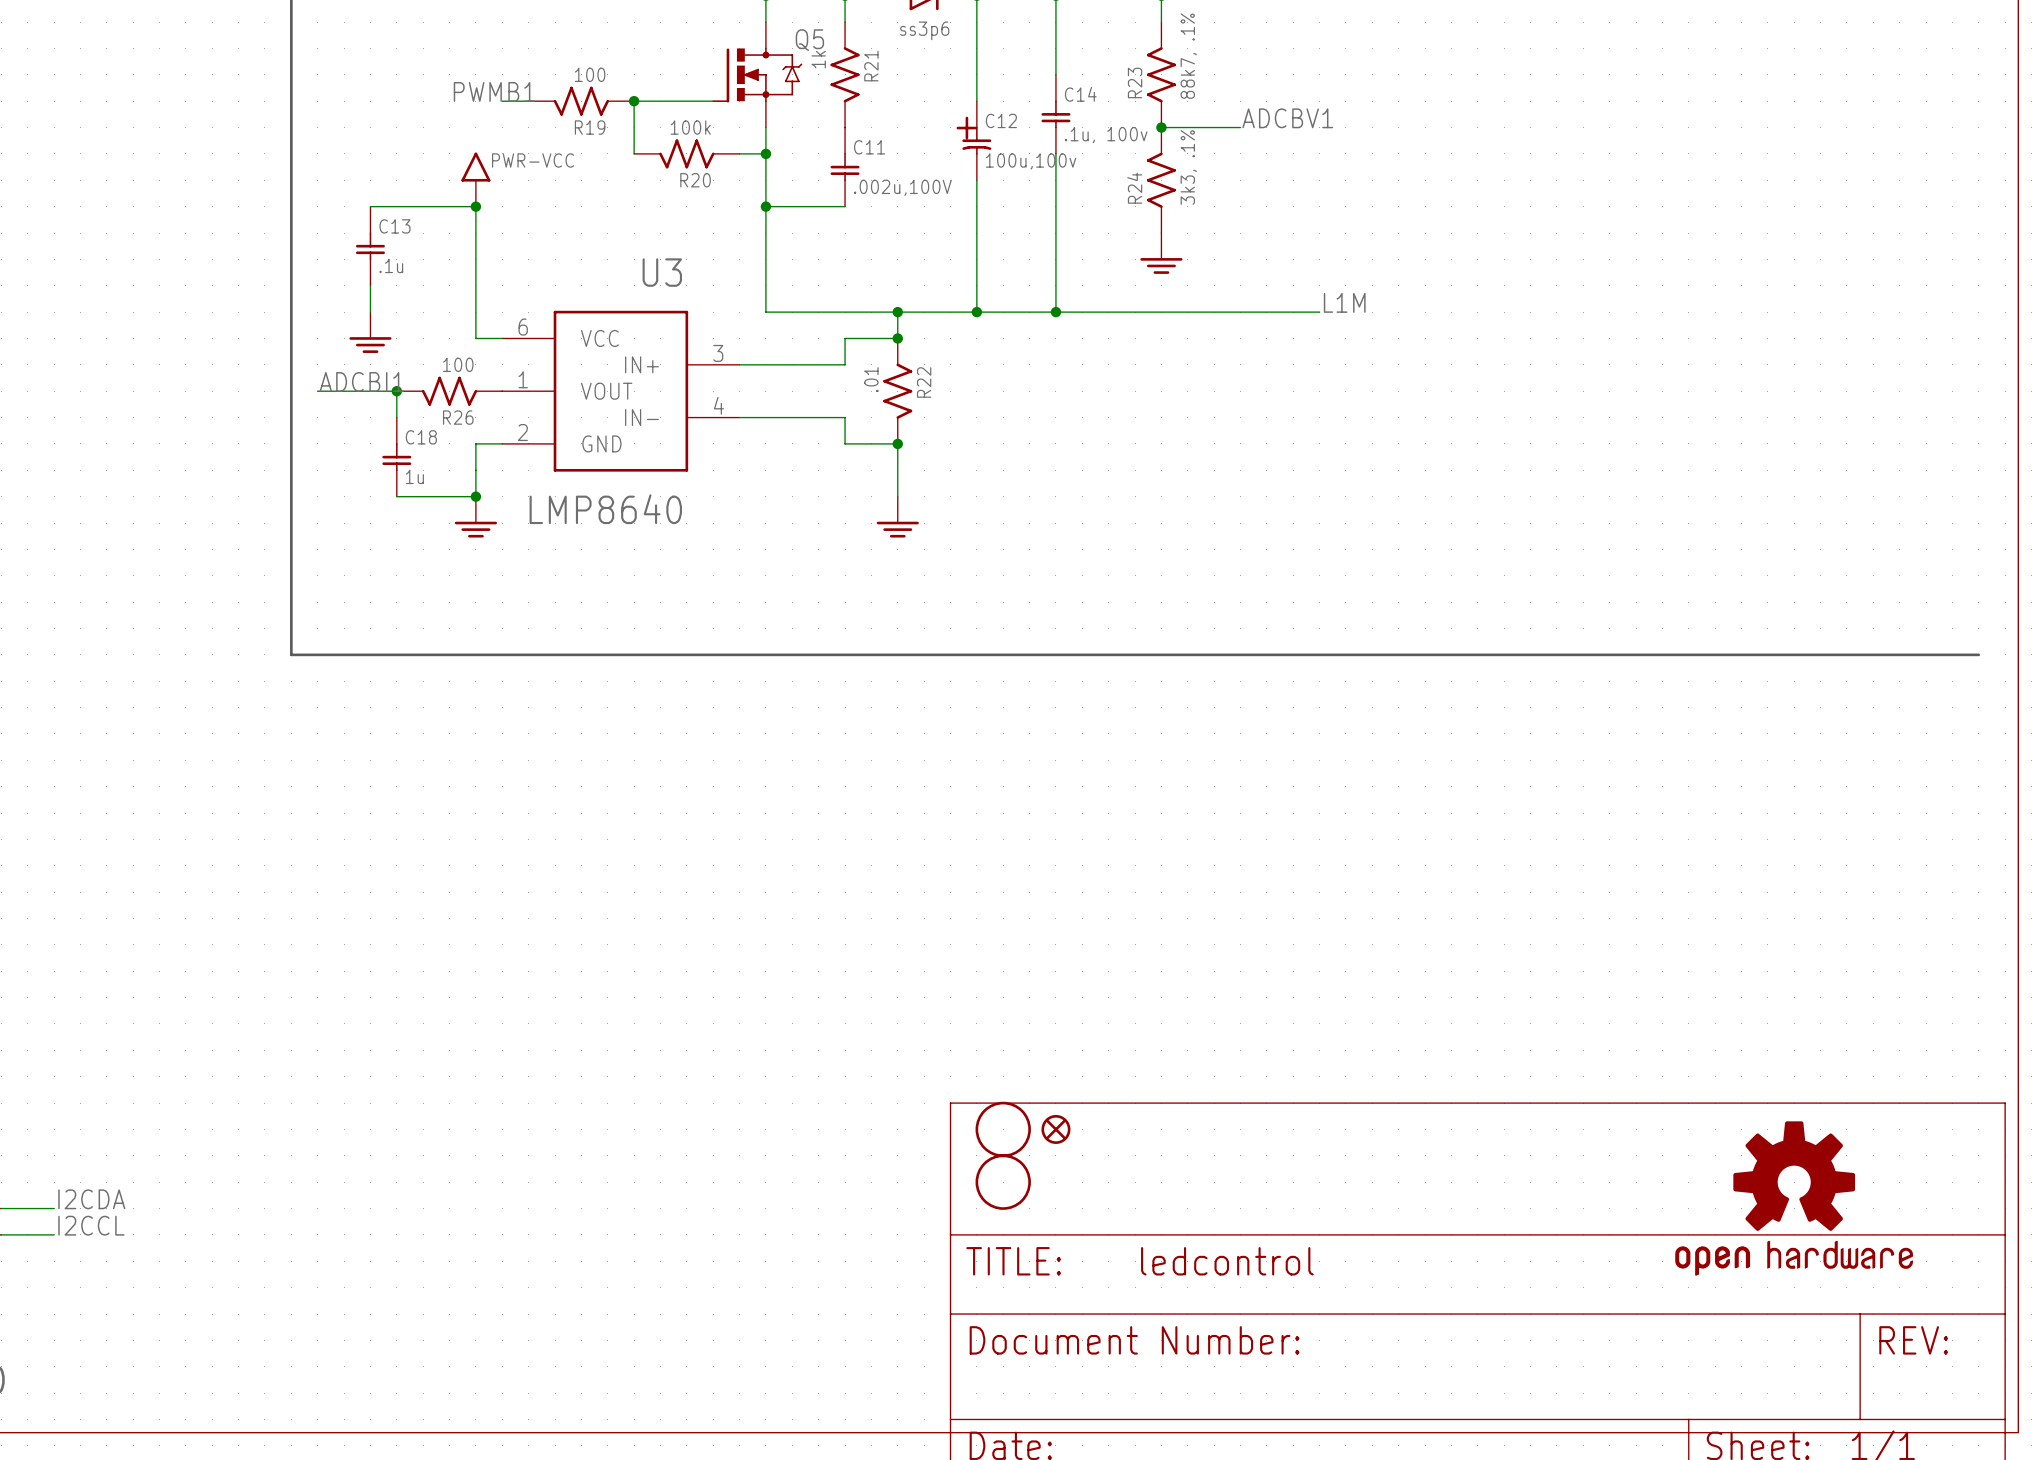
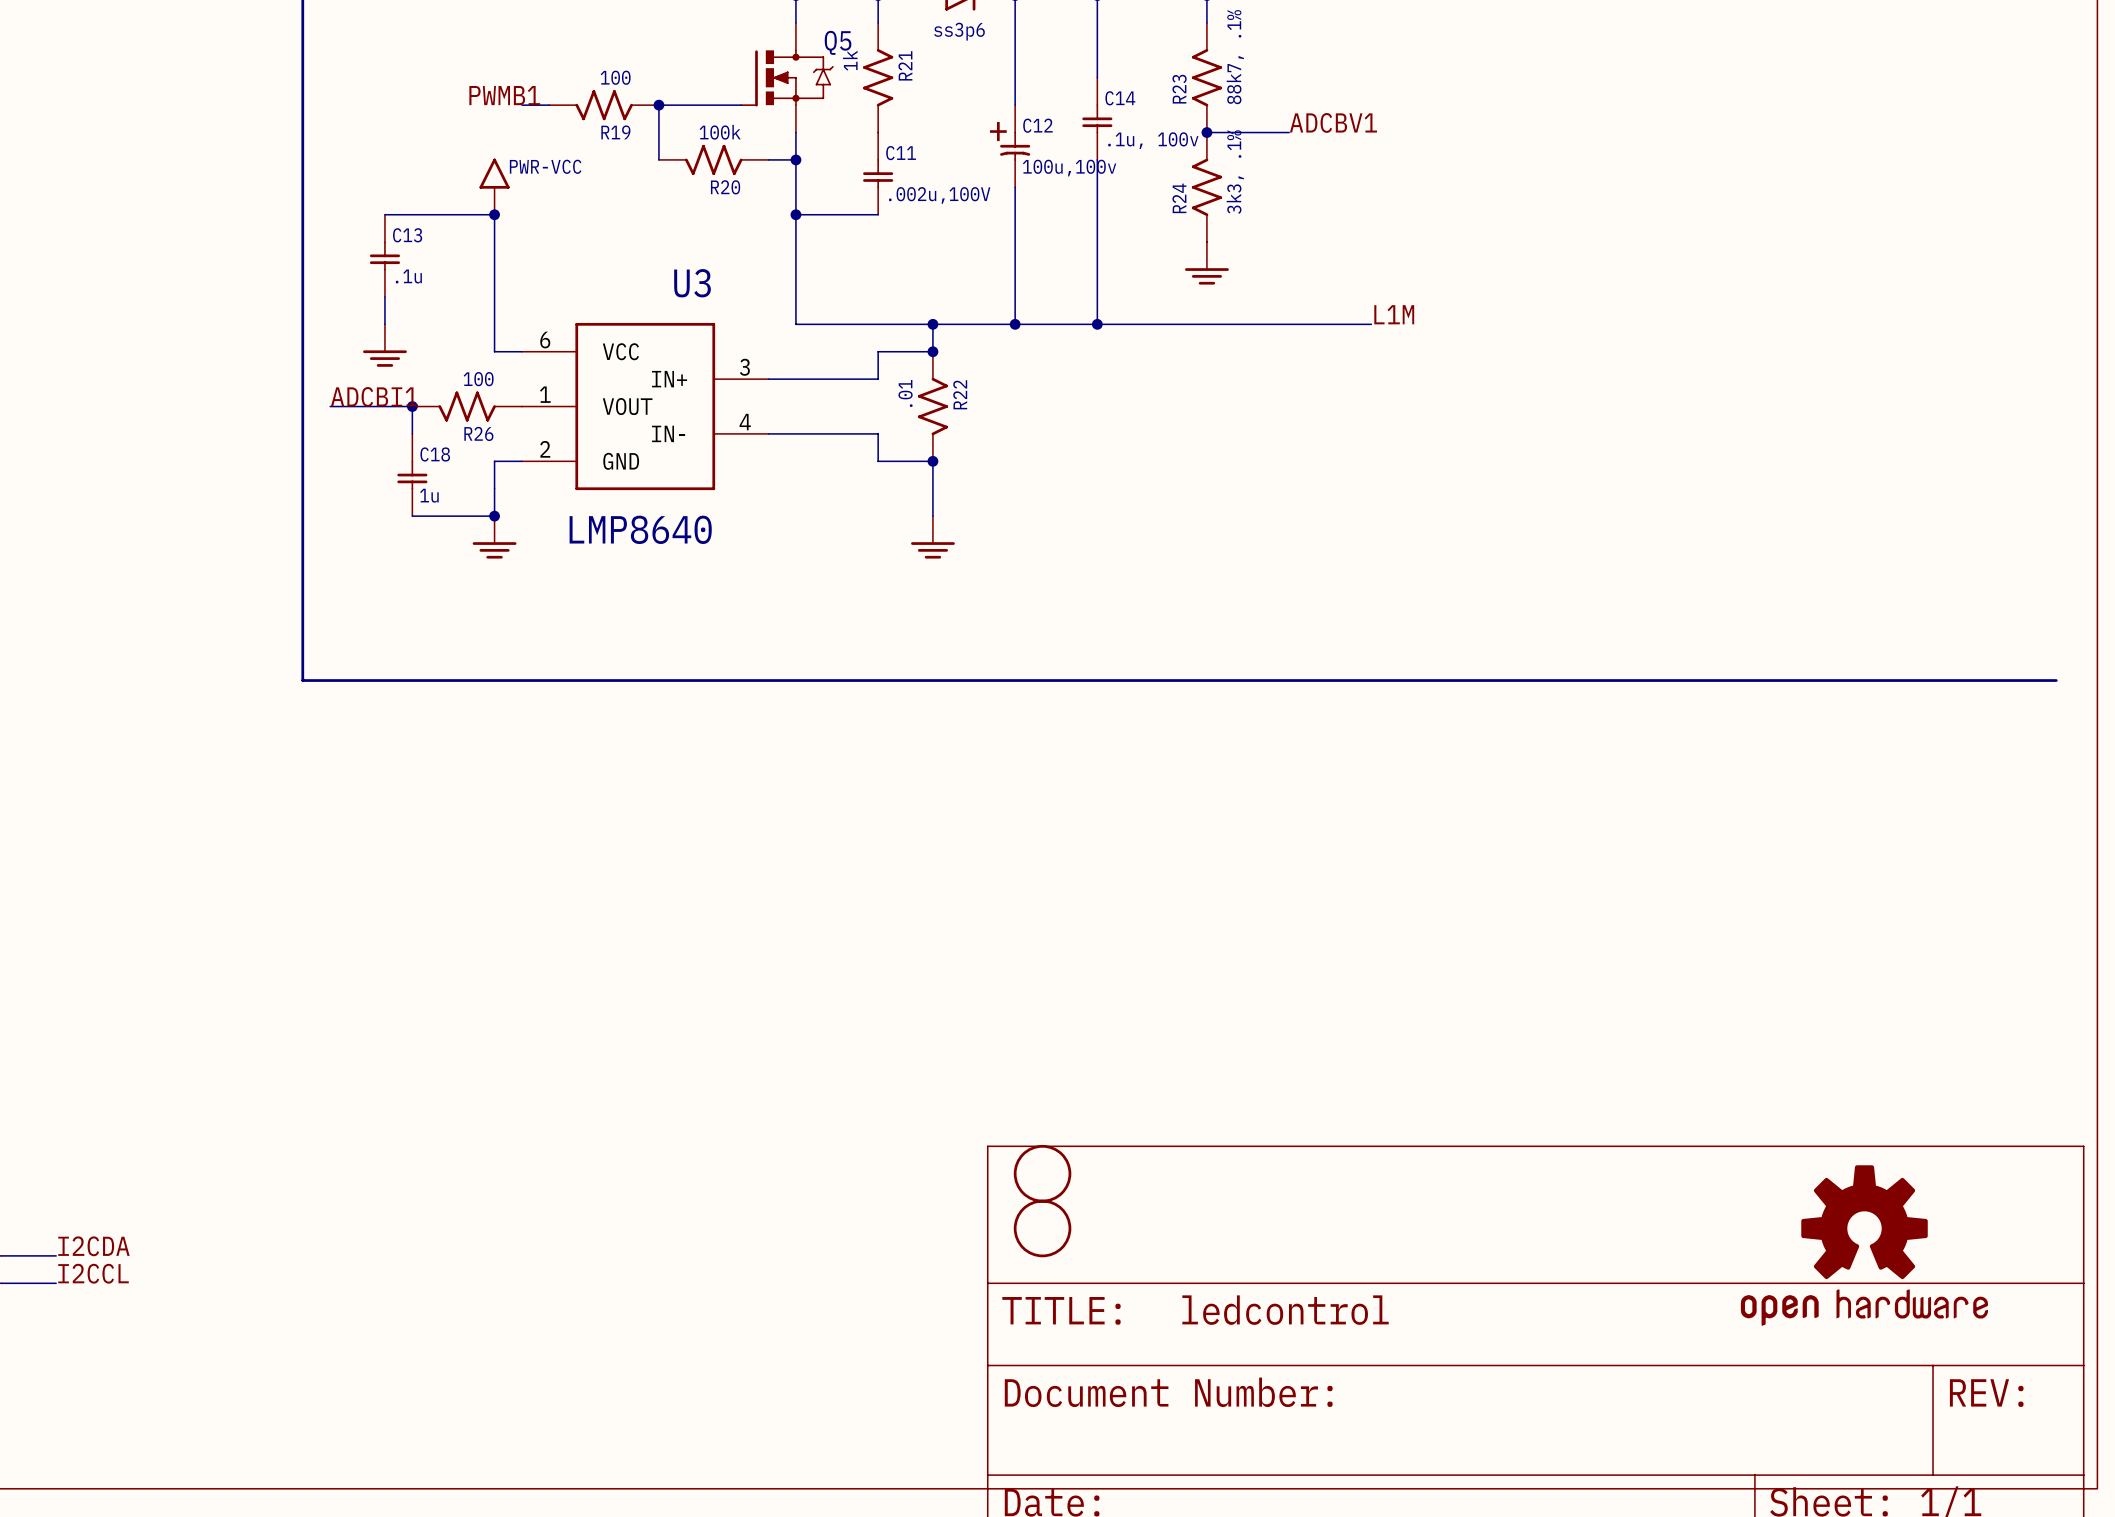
part: (1055, 1129) -> none

